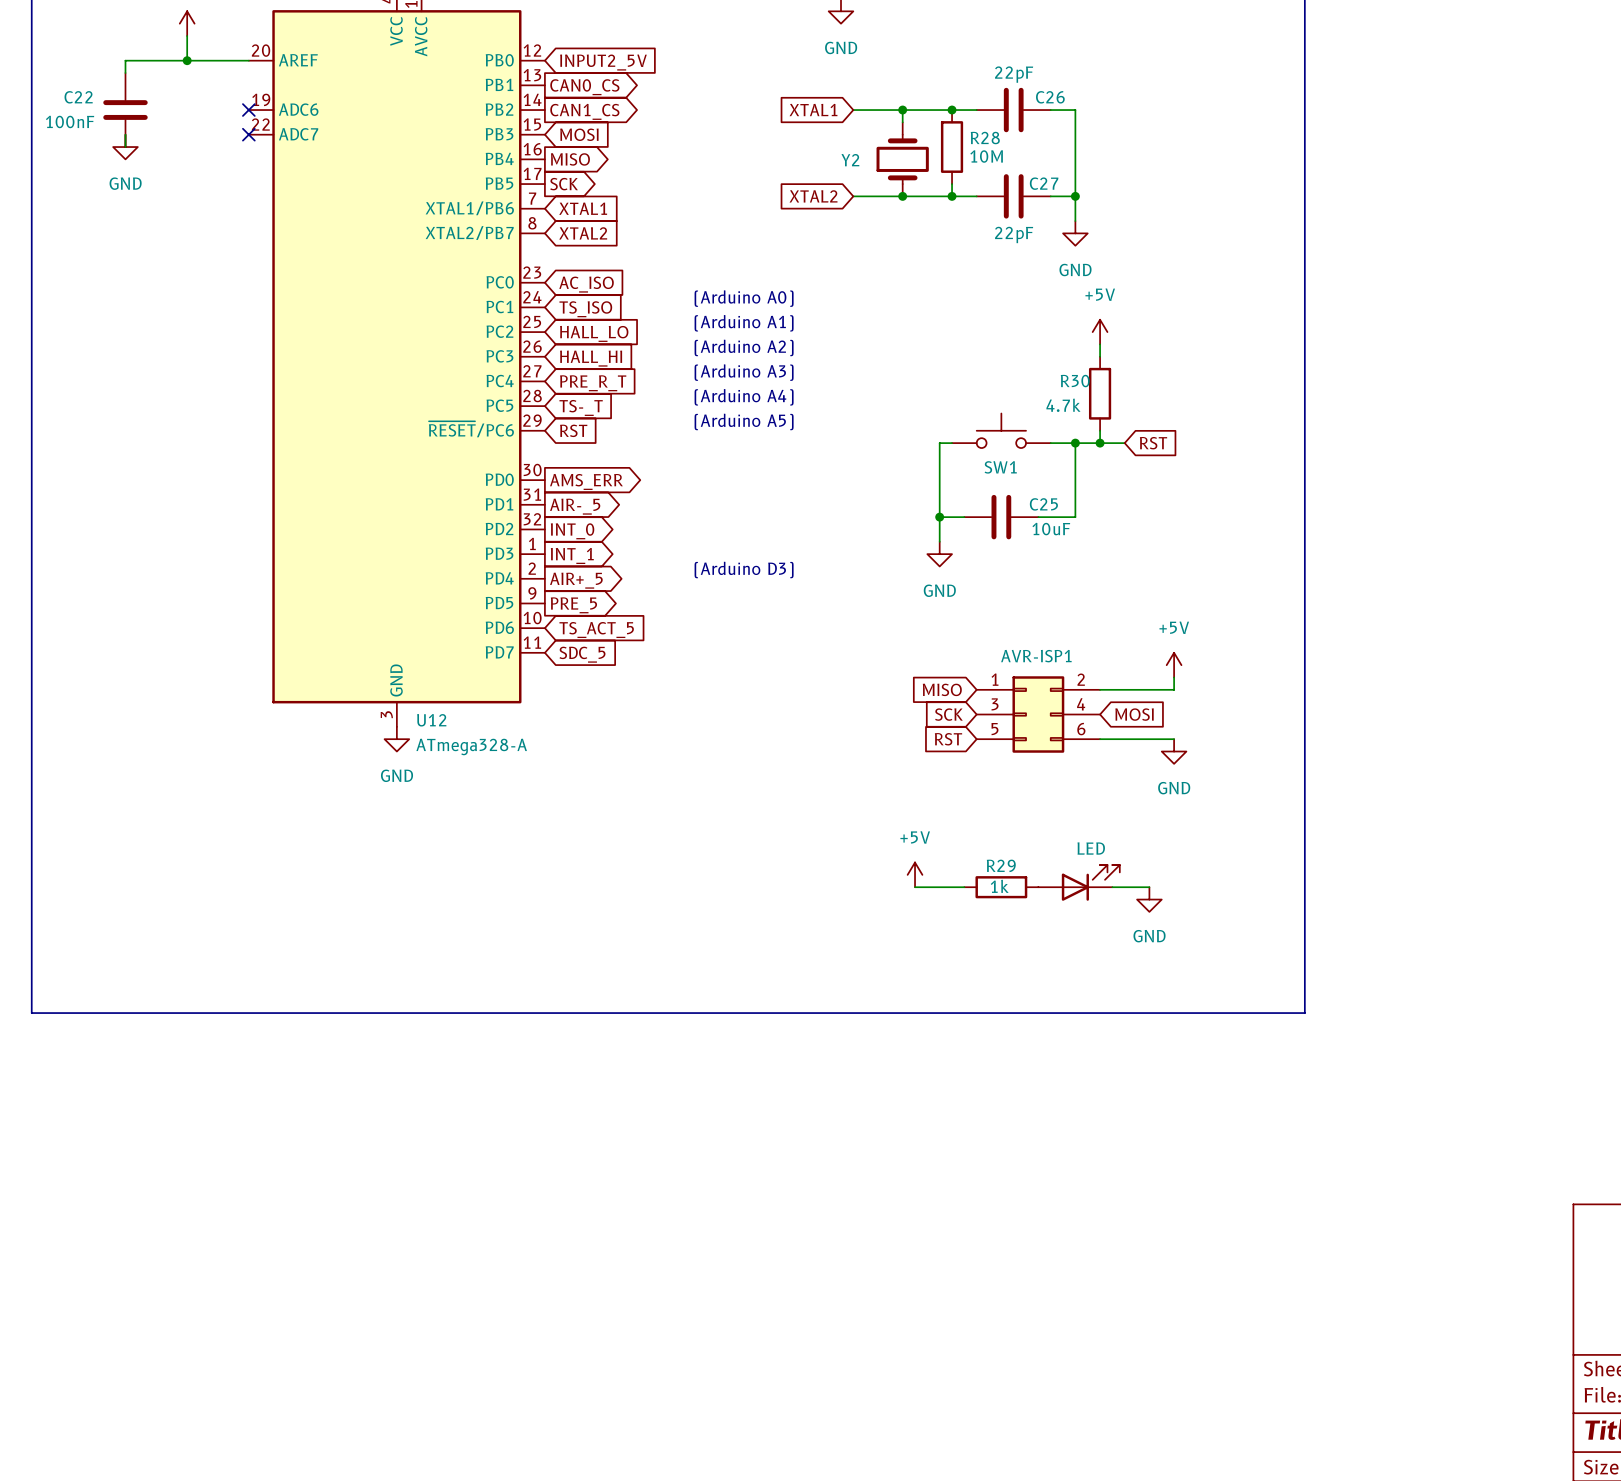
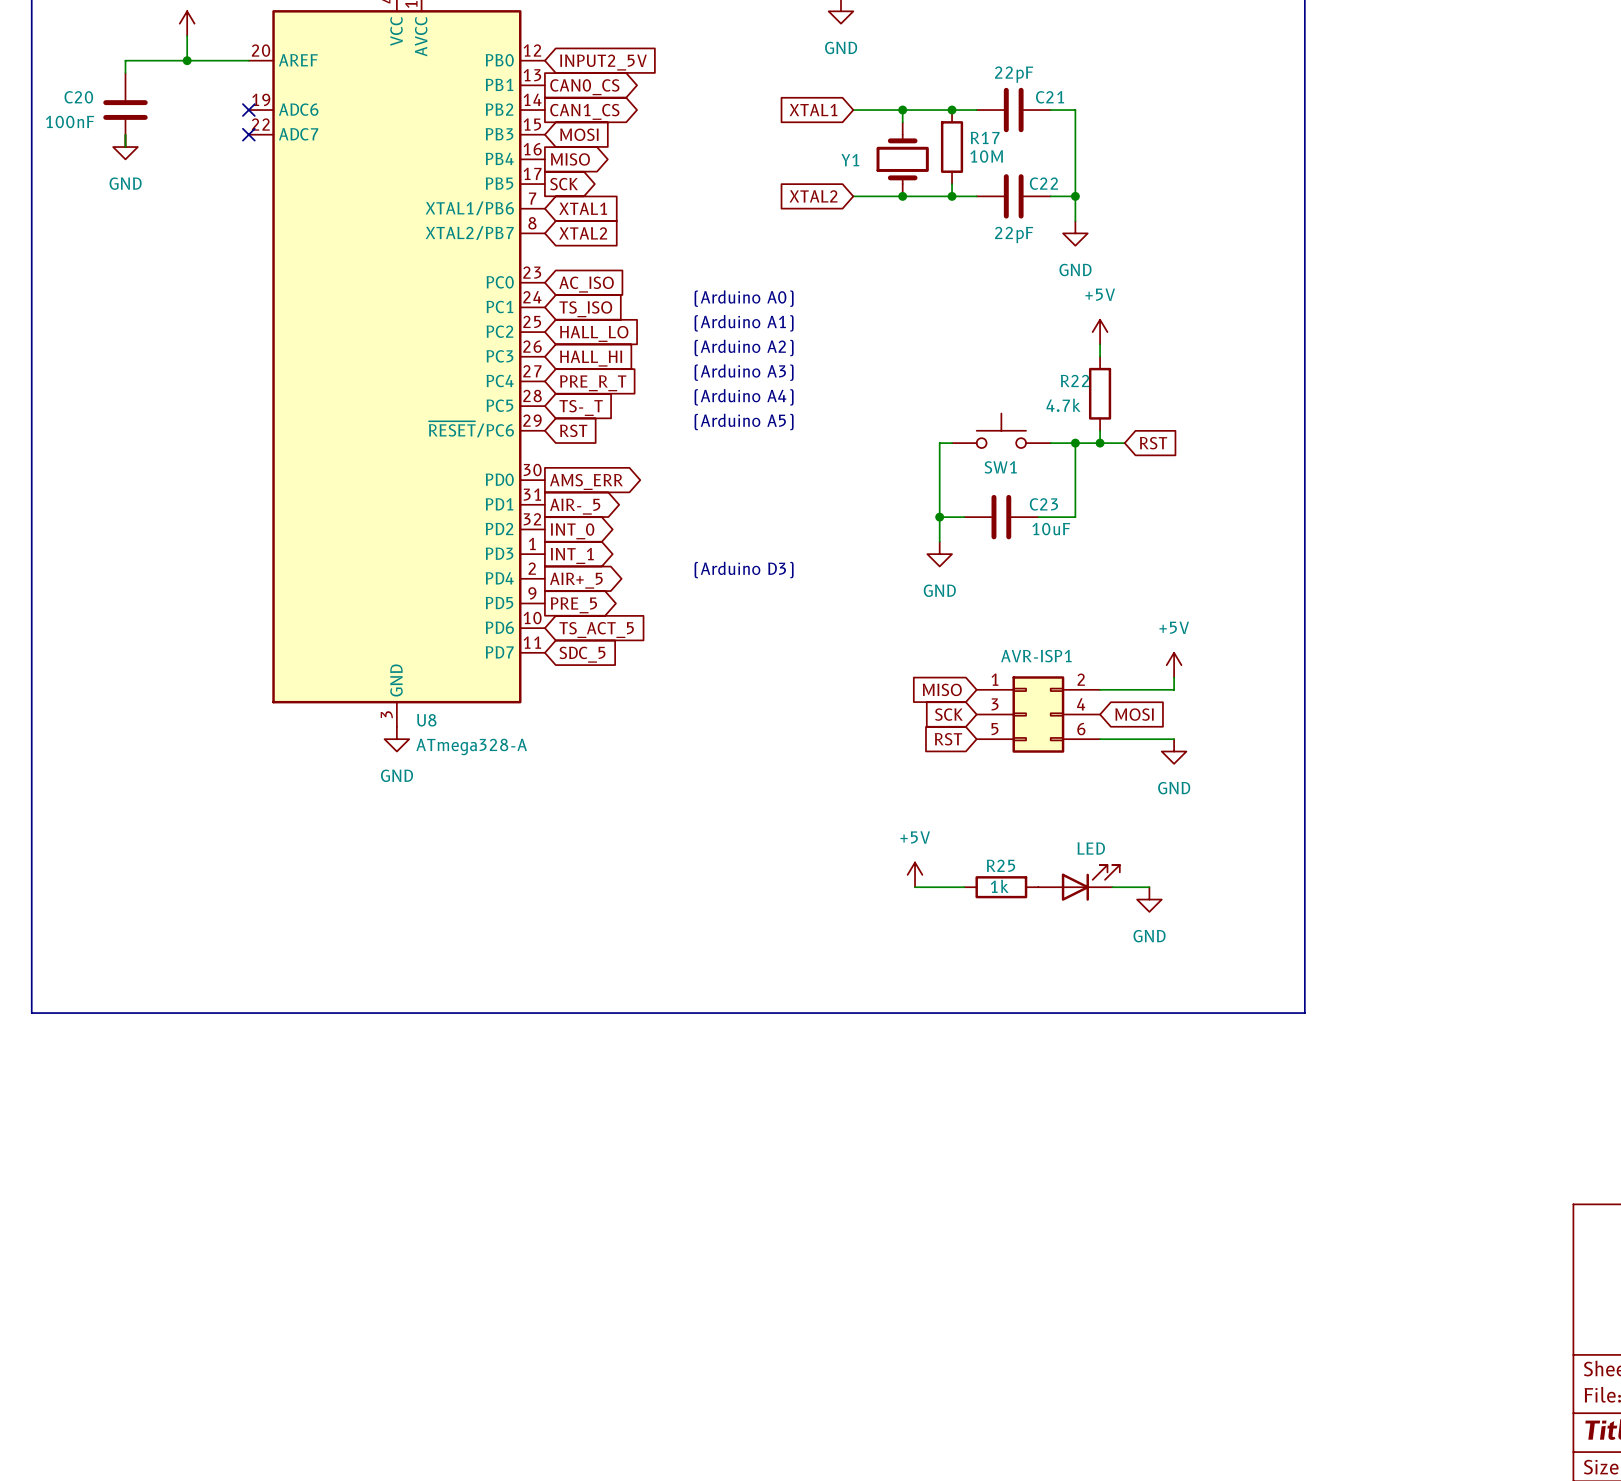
C22 name: C22 (78, 97) -> C20 (78, 97)
C26 name: C26 (1050, 97) -> C21 (1050, 97)
R28 name: R28 (985, 138) -> R17 (985, 137)
Y2 name: Y2 (850, 160) -> Y1 (850, 160)
C27 name: C27 (1044, 183) -> C22 (1043, 183)
R30 name: R30 (1075, 381) -> R22 (1075, 380)
C25 name: C25 (1043, 504) -> C23 (1043, 504)
U12 name: U12 (431, 720) -> U8 (426, 720)
R29 name: R29 (1001, 865) -> R25 (1000, 865)

